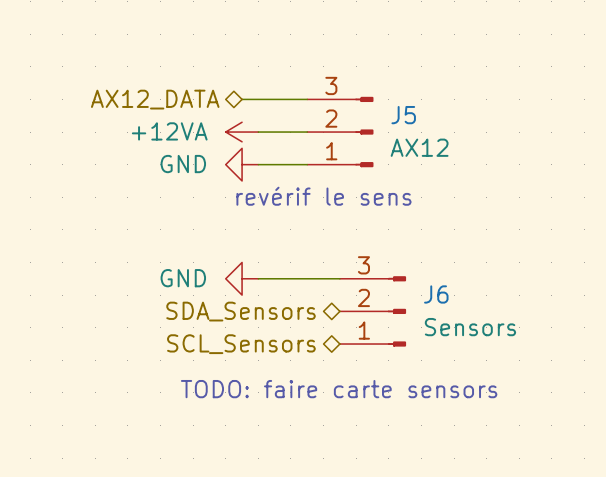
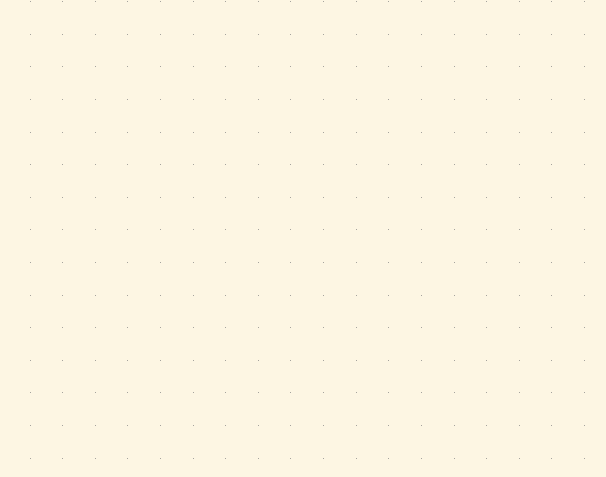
hierarchical label: AX12_DATA (155, 99) -> none
wire: (242, 99) (307, 99) -> none
power symbol: +12VA (242, 132) -> none
wire: (258, 132) (307, 132) -> none
J5: AX12 (340, 132) -> none
power symbol: GND (242, 164) -> none
wire: (258, 164) (307, 164) -> none
text: revérif le sens (323, 196) -> none
power symbol: GND (242, 278) -> none
wire: (258, 278) (339, 278) -> none
hierarchical label: SDA_Sensors (241, 311) -> none
J6: Sensors (372, 311) -> none
hierarchical label: SCL_Sensors (241, 344) -> none
text: TODO: faire carte sensors (339, 389) -> none

